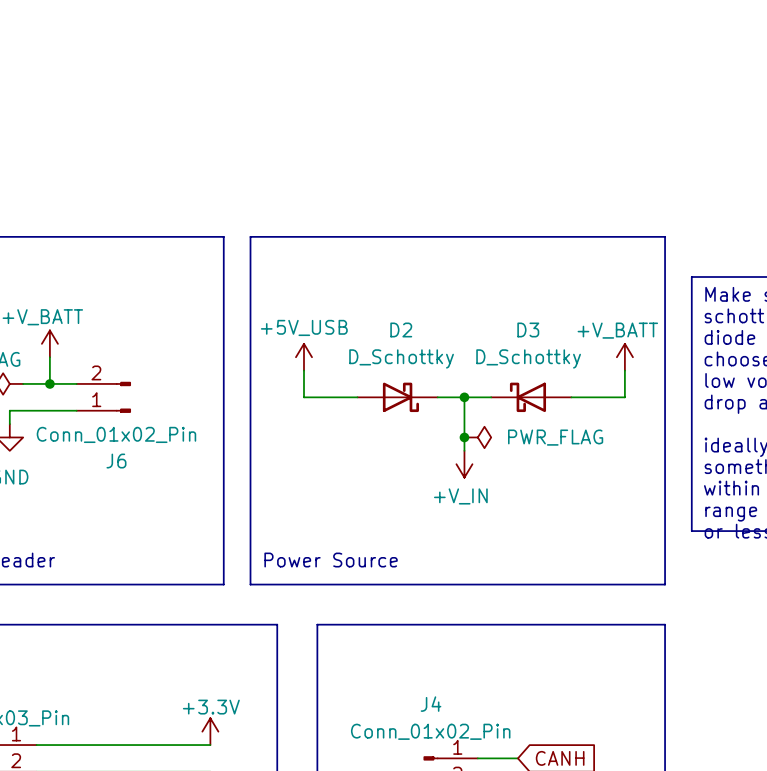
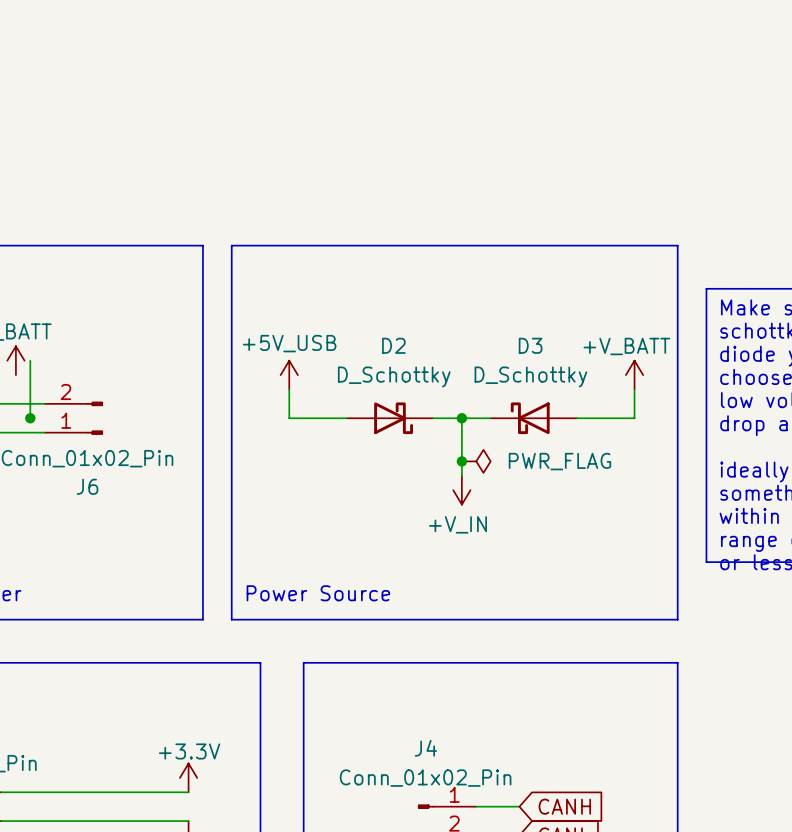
wire: none -> (30, 360) (30, 418)
wire: (49, 357) (49, 383) -> none
junction position: (49, 383) -> (30, 418)

